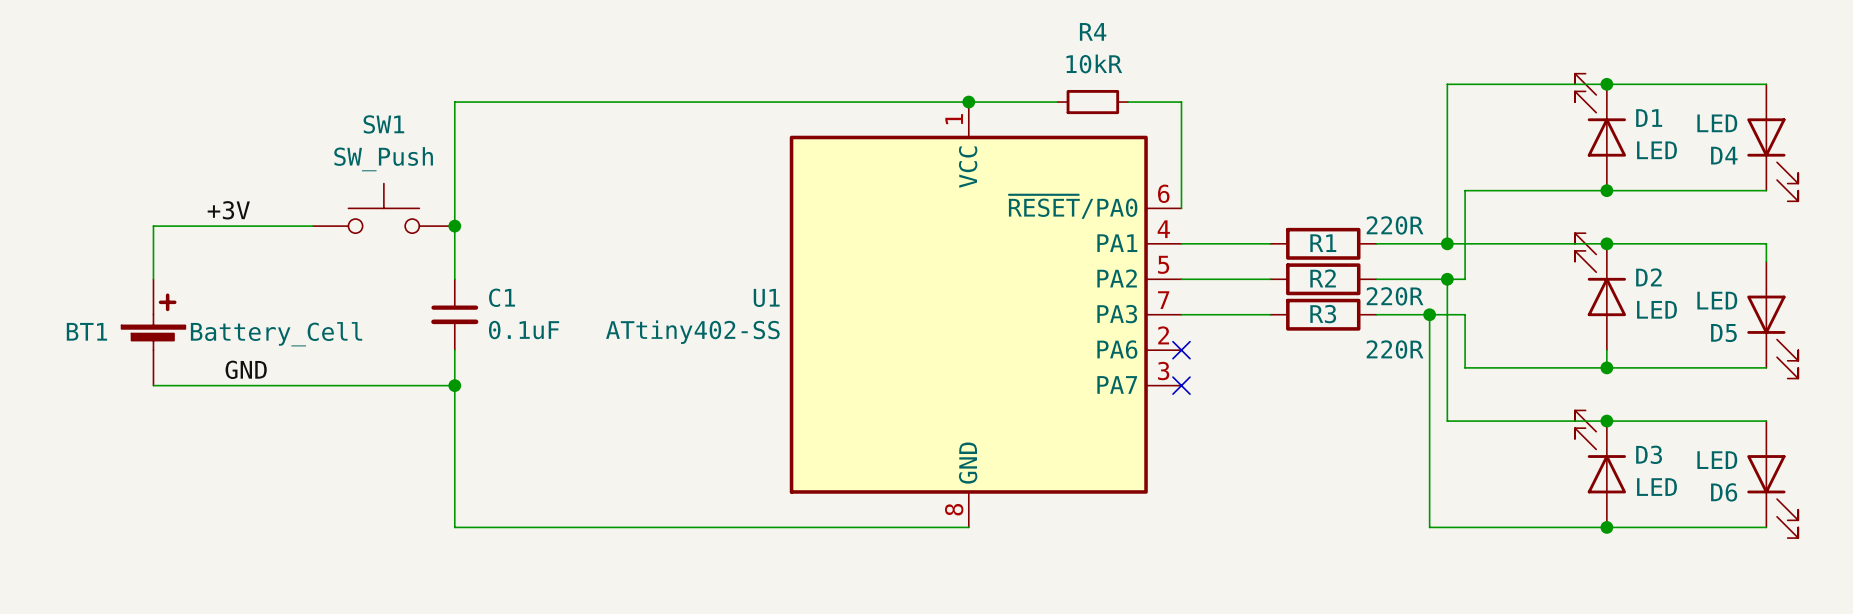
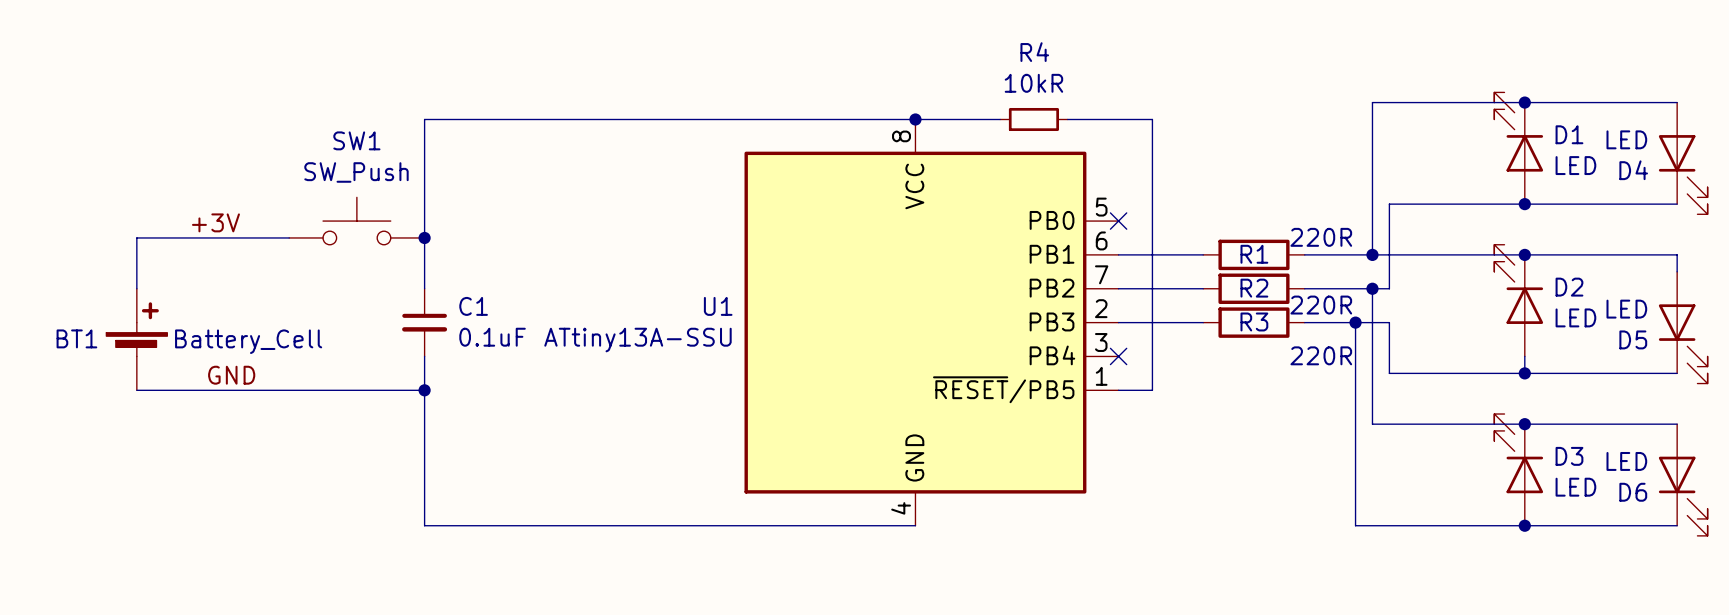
U1 symbol: [789, 102, 1182, 528] -> [744, 119, 1119, 526]
wire: (1181, 102) (1181, 208) -> (1118, 119) (1152, 119) (1152, 390) (1118, 390)
no-connect mark: none -> (1118, 221)
U1 value: ATtiny402-SS (692, 332) -> ATtiny13A-SSU (637, 340)
no-connect mark: (1181, 385) -> none

